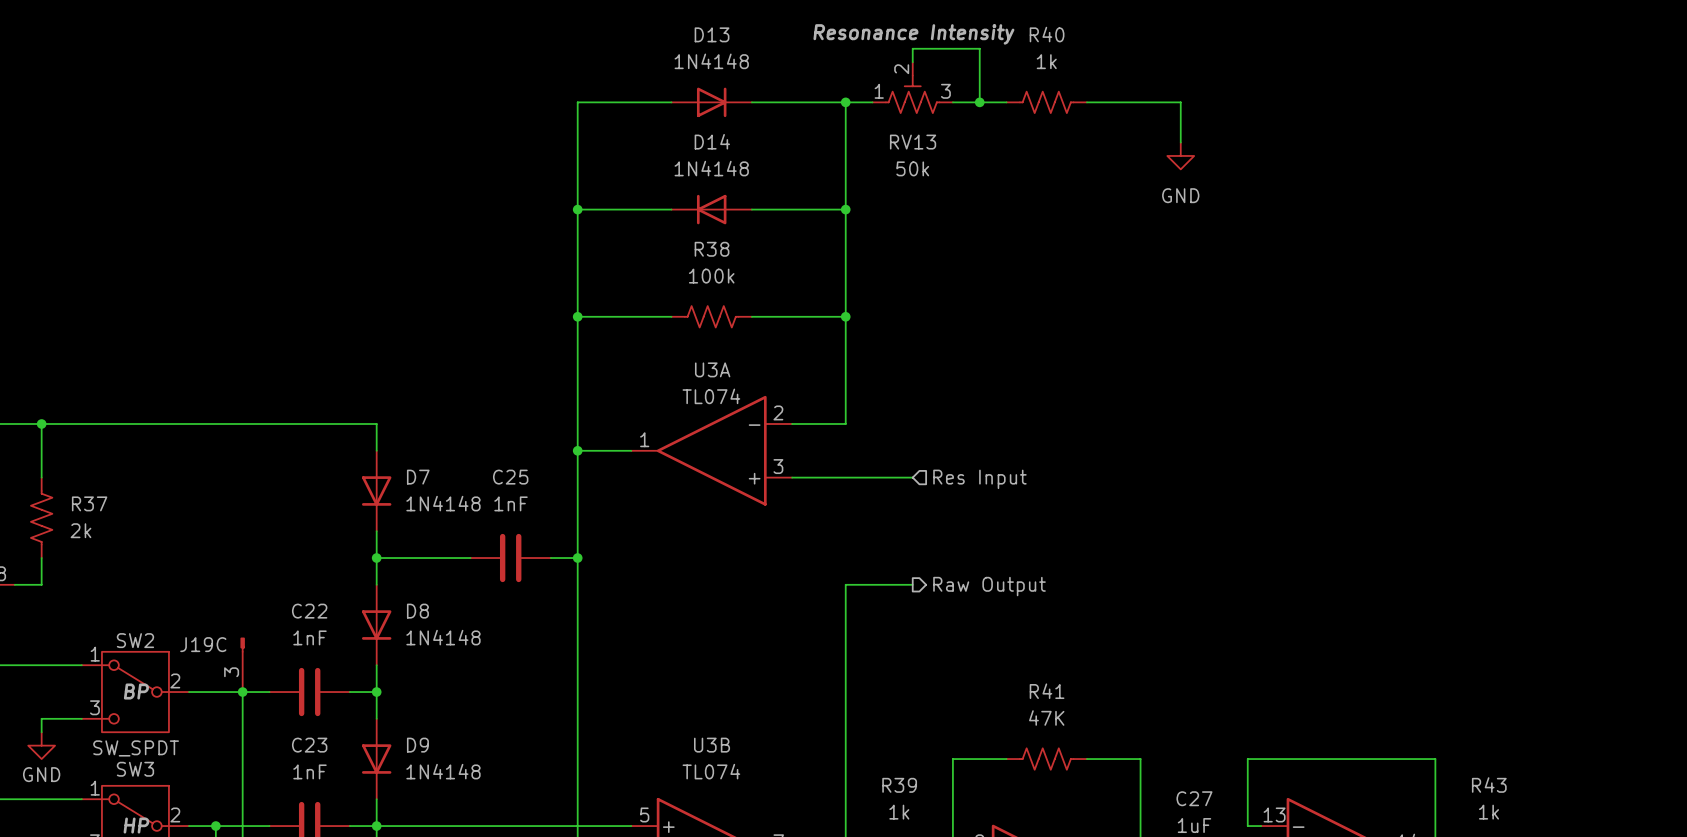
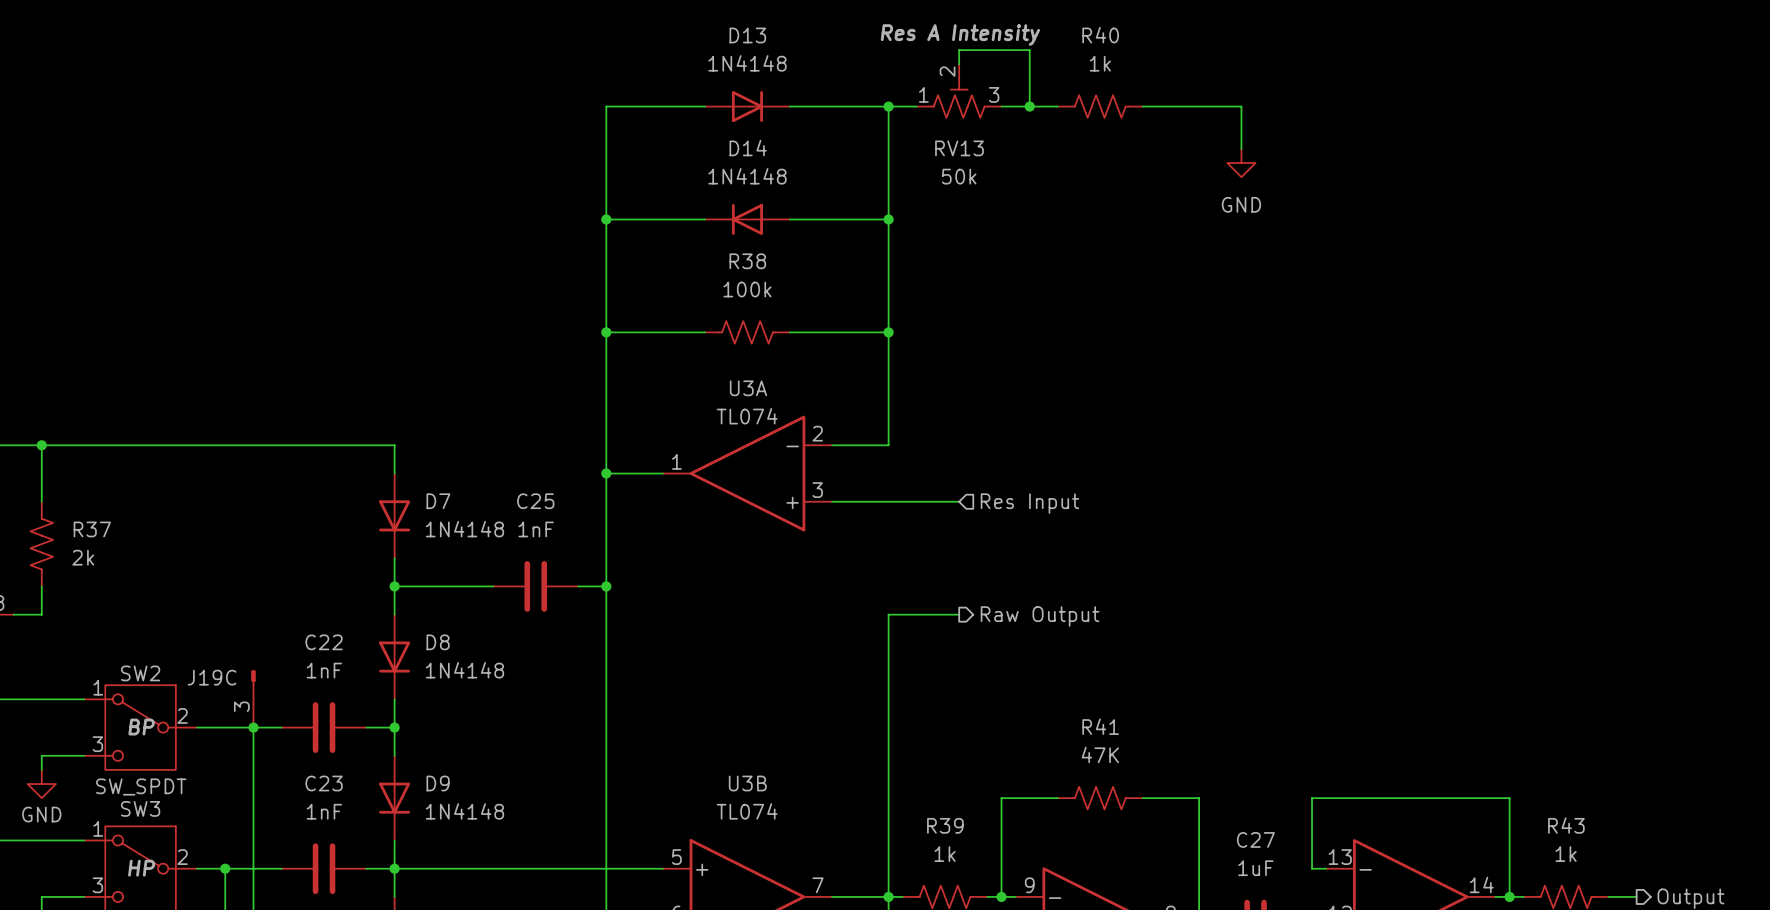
RV13 text: Resonance Intensity (913, 34) -> Res A Intensity (960, 35)

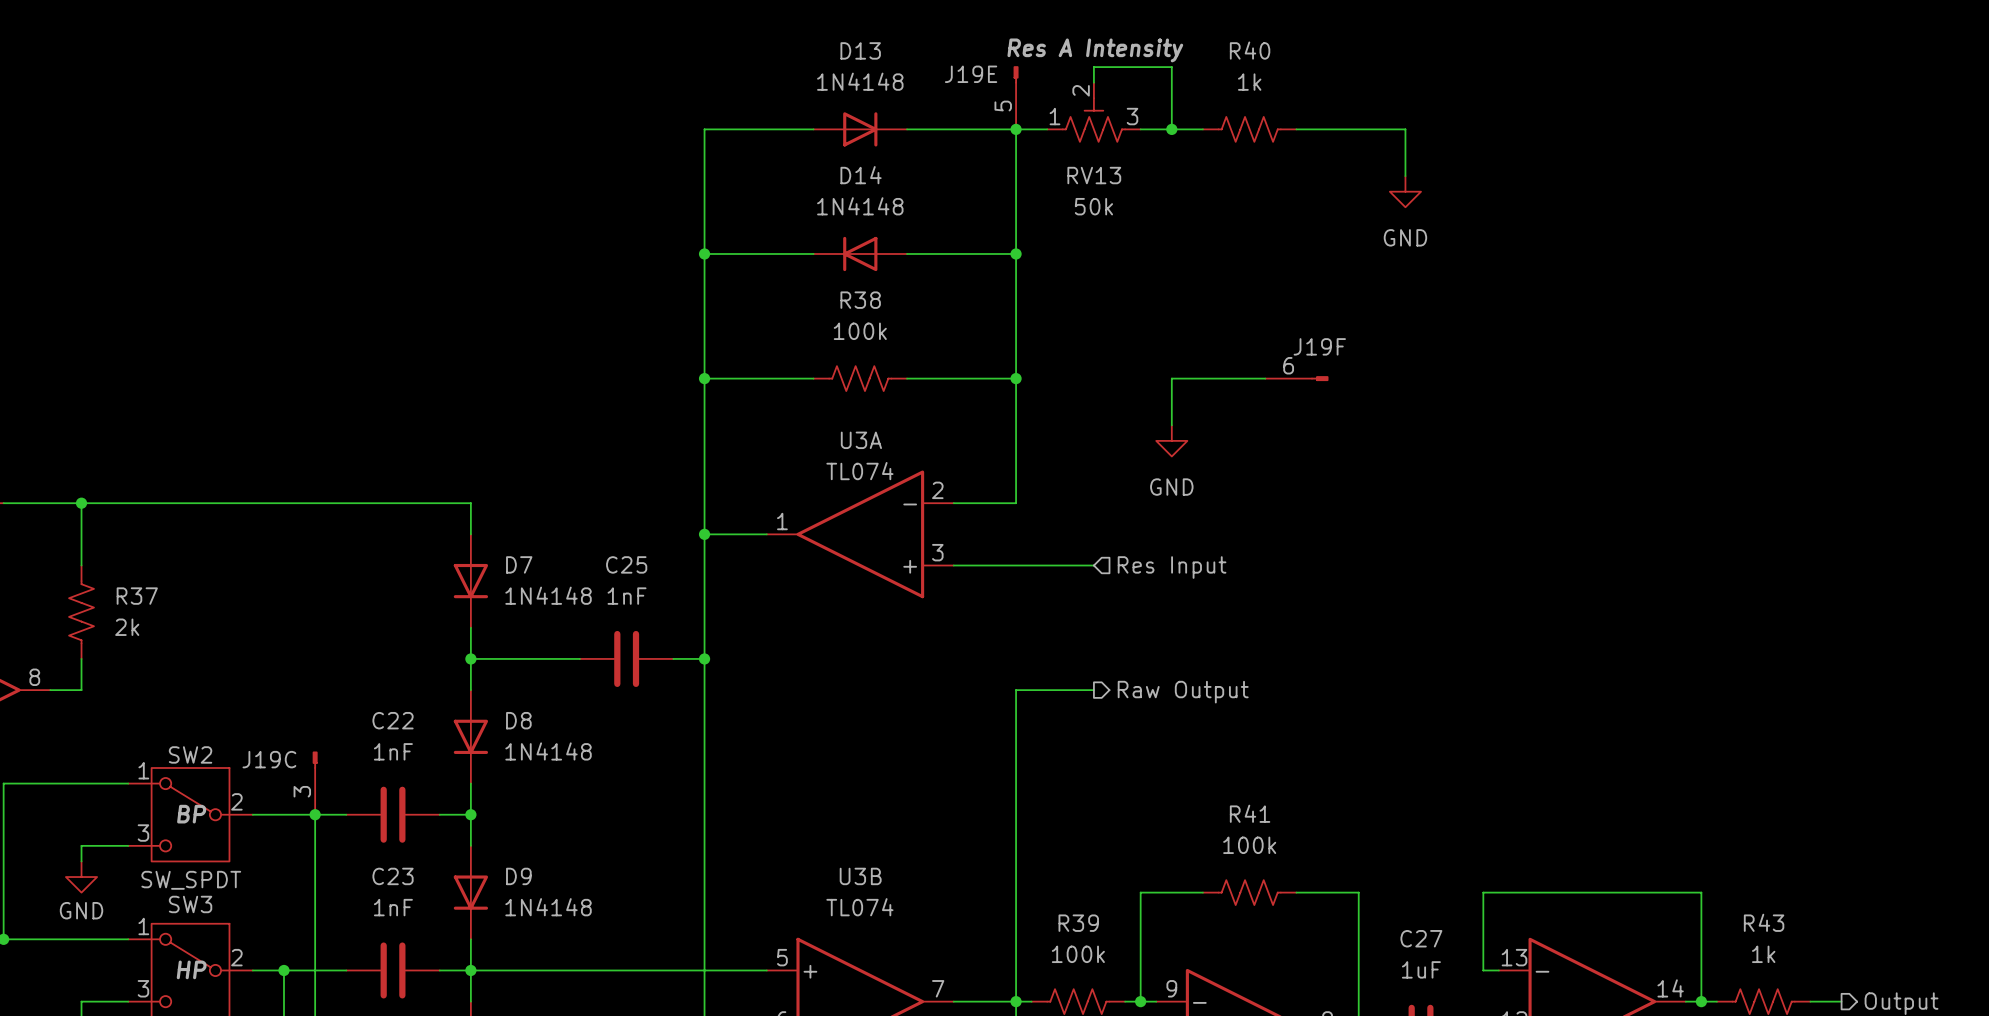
J19E: none -> (1016, 97)
wire: none -> (1265, 378) (1171, 378) (1171, 425)
J19F: none -> (1296, 378)
power symbol: none -> GND (1171, 440)
R41 value: 47K (1100, 754) -> 100k (1249, 845)
R39 value: 1k (945, 854) -> 100k (1078, 954)

